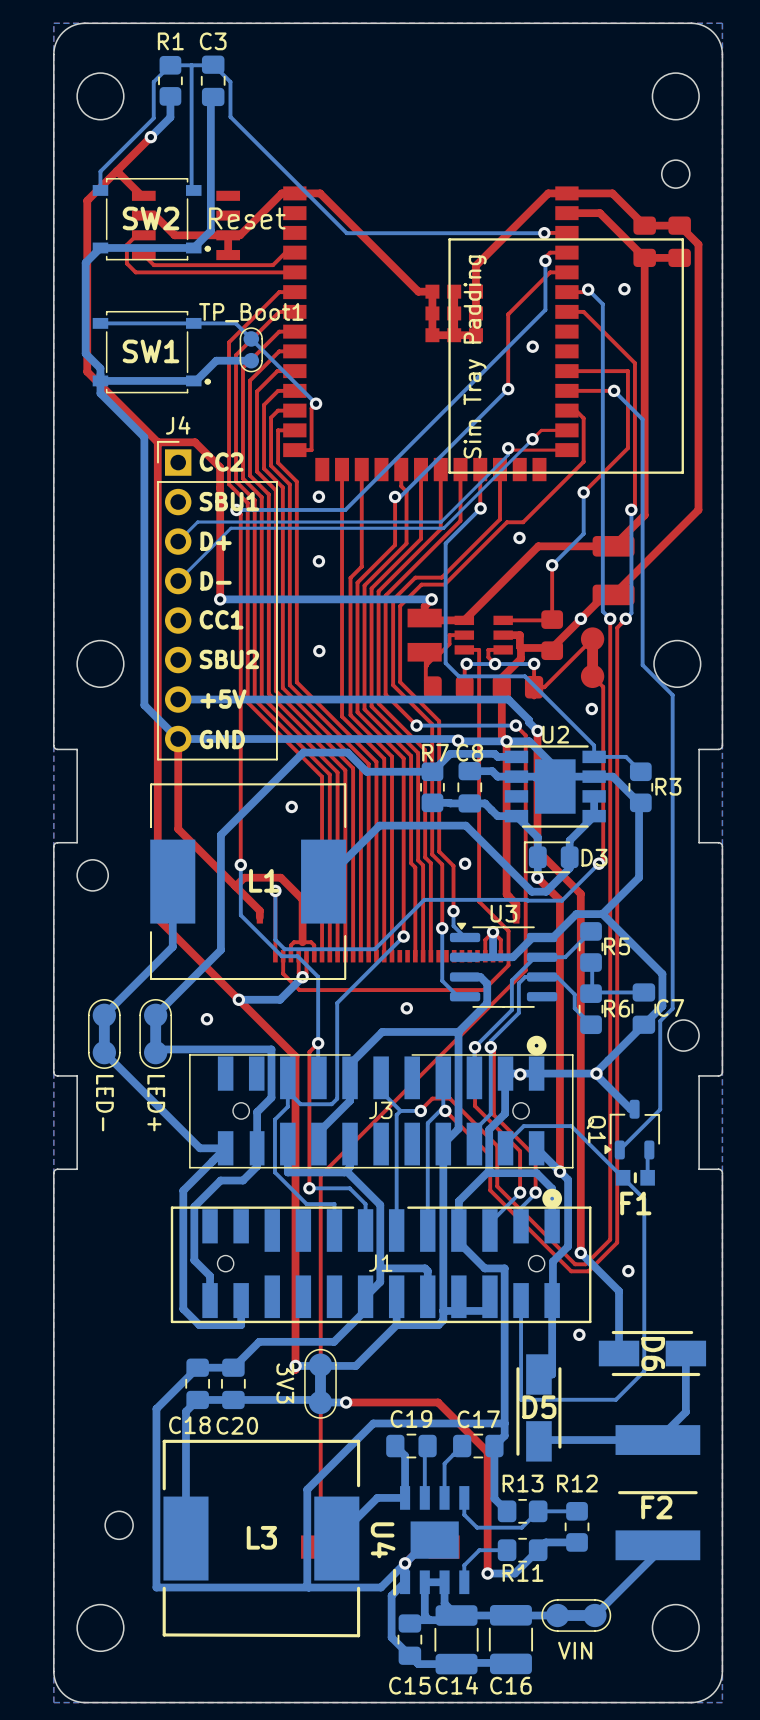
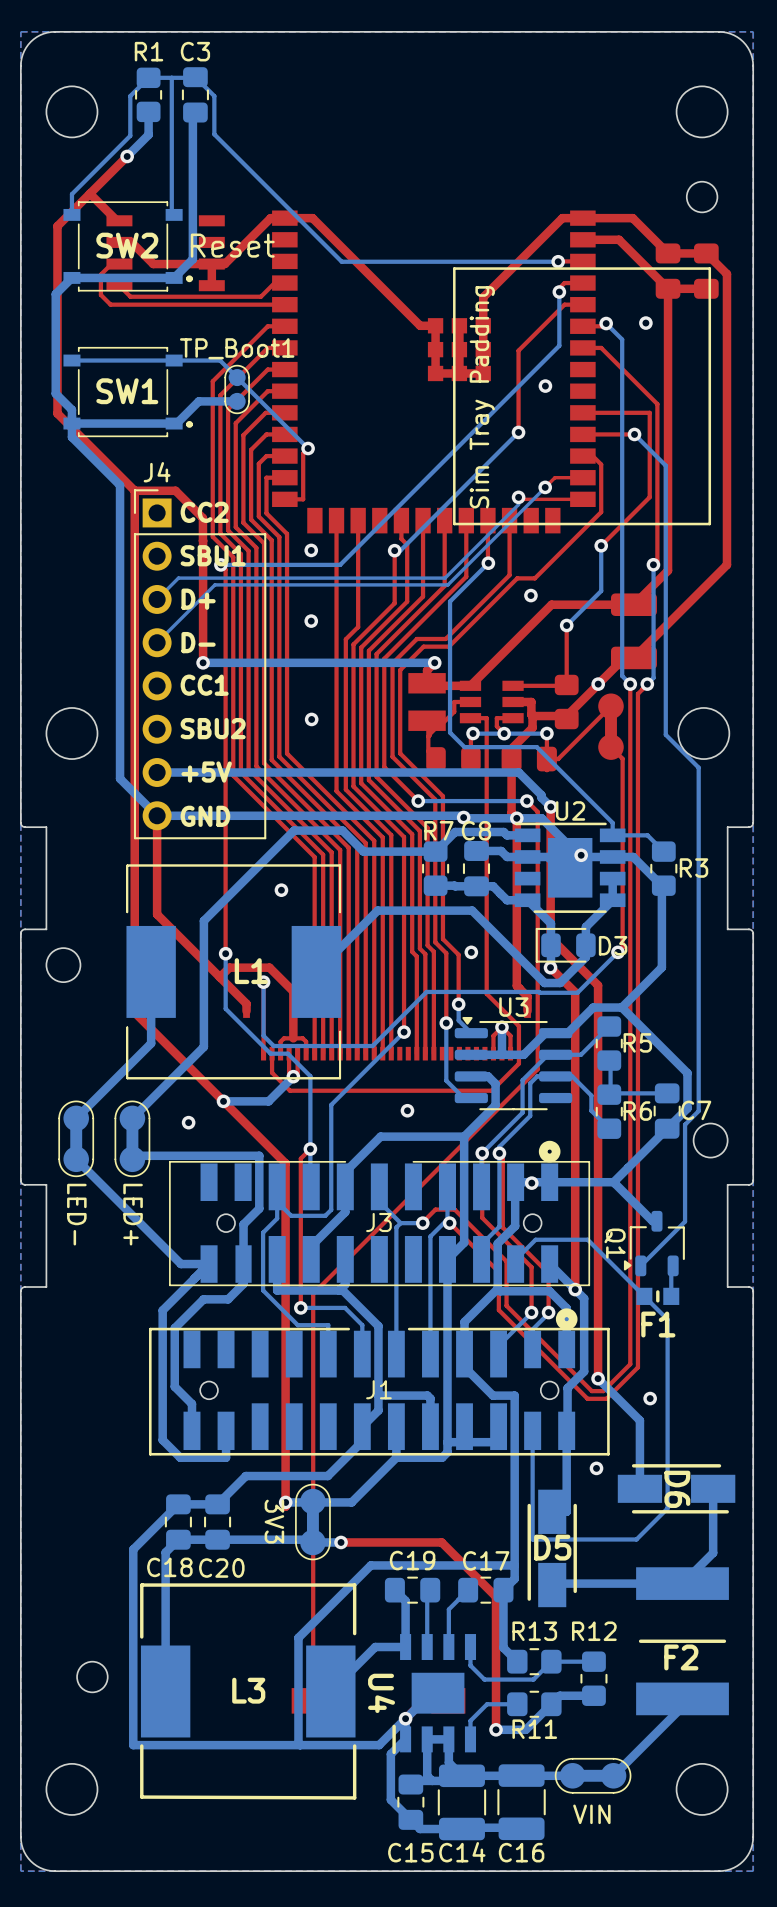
via position: (591, 709) -> (581, 855)
via: (596, 1073) -> none

